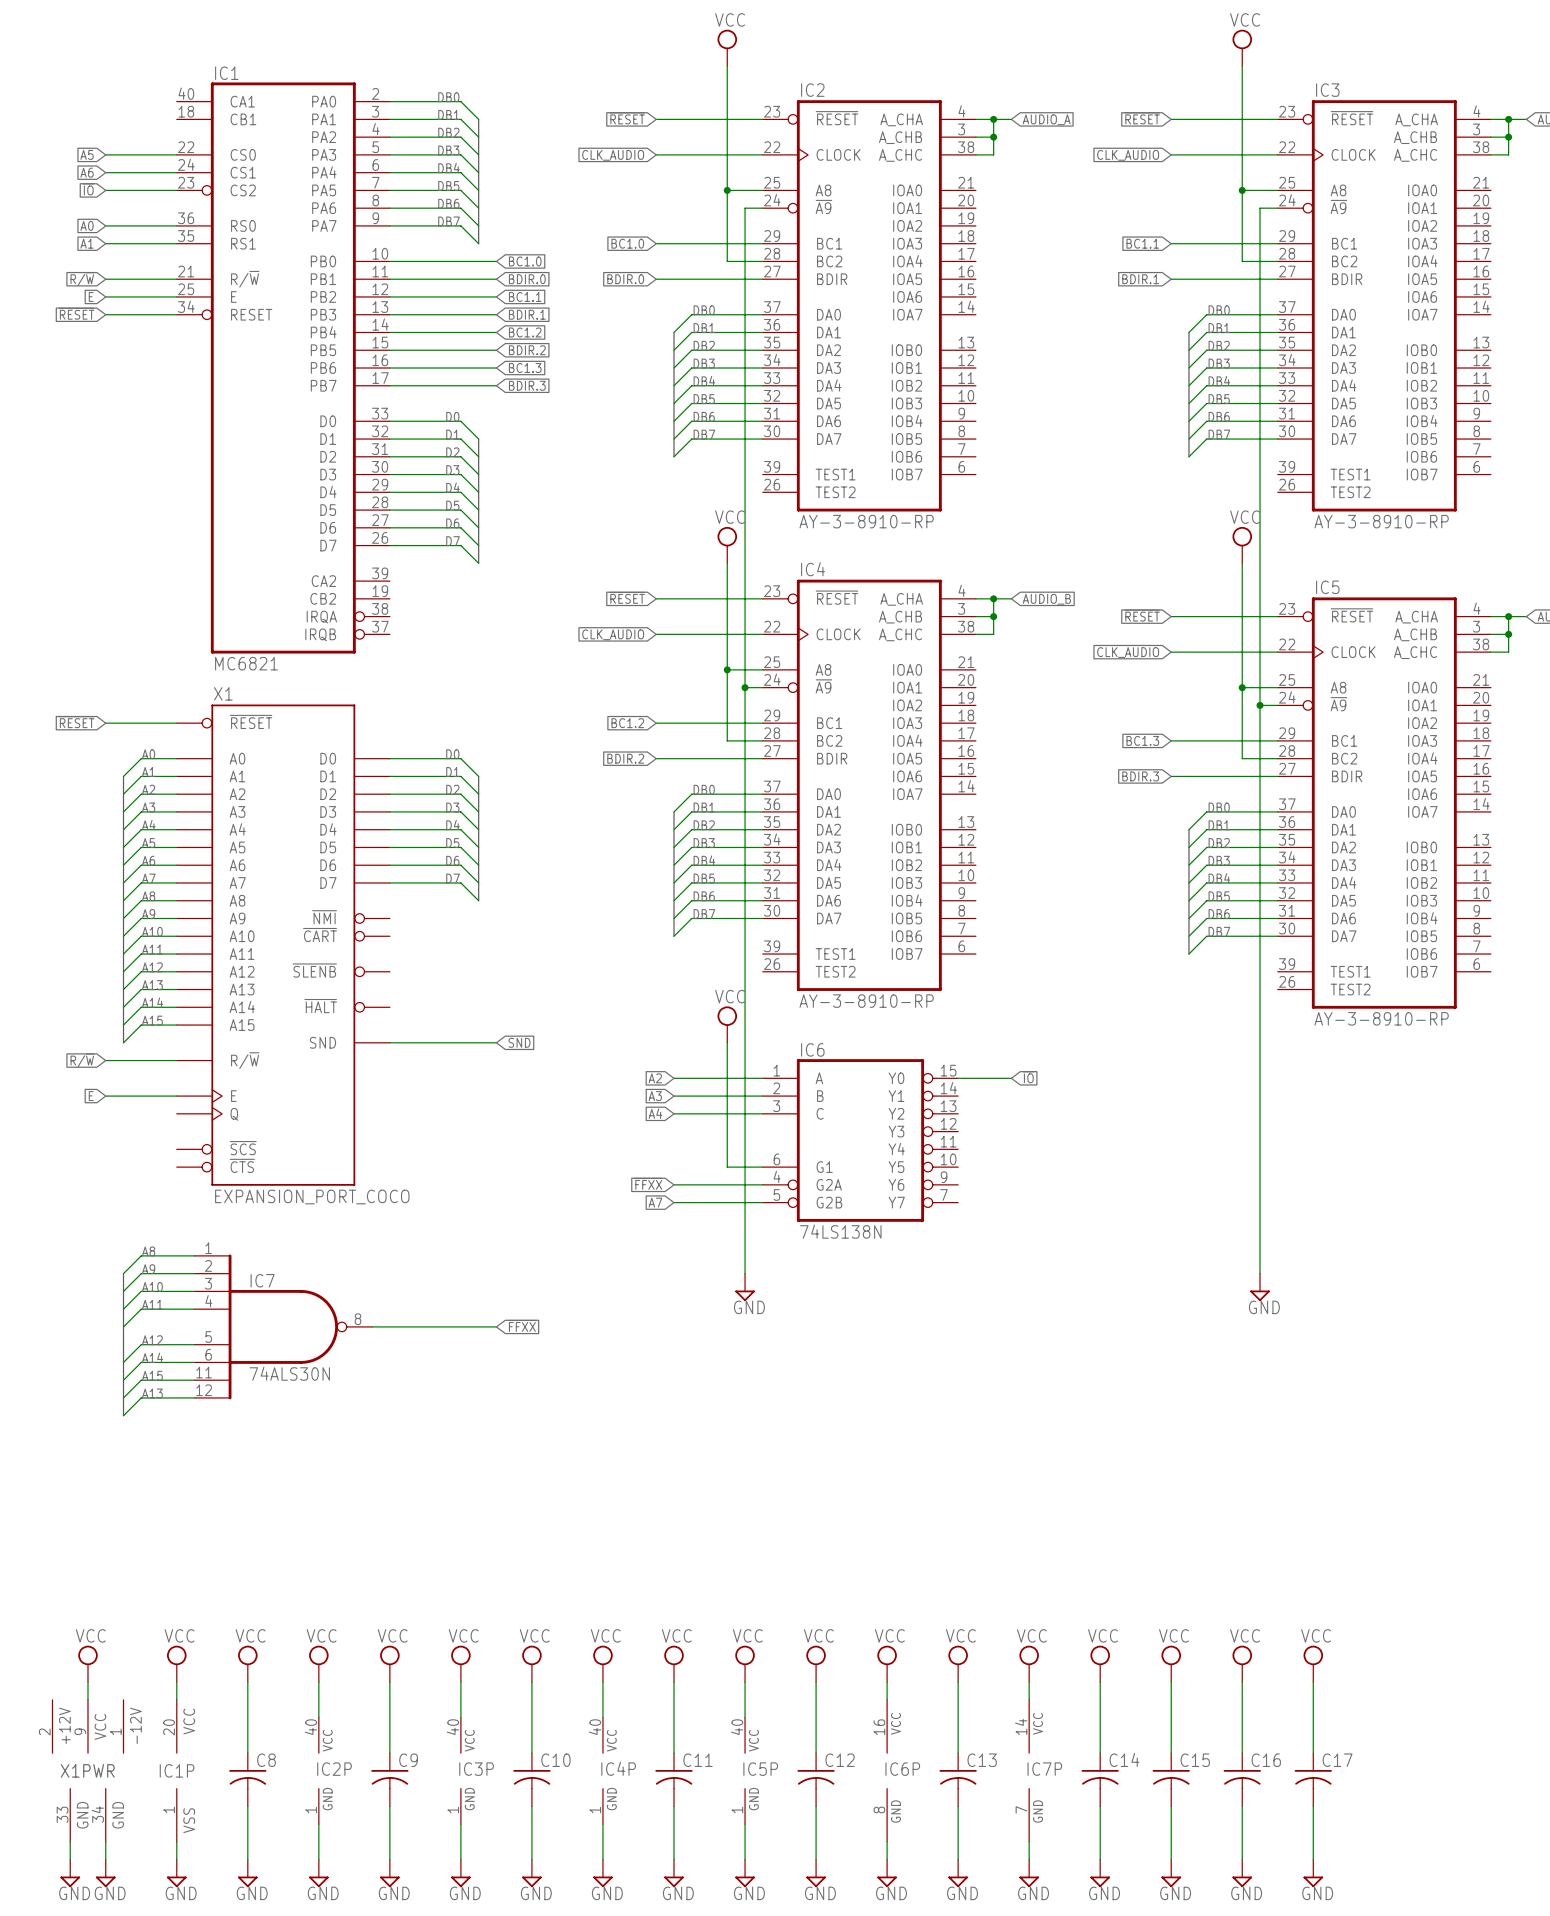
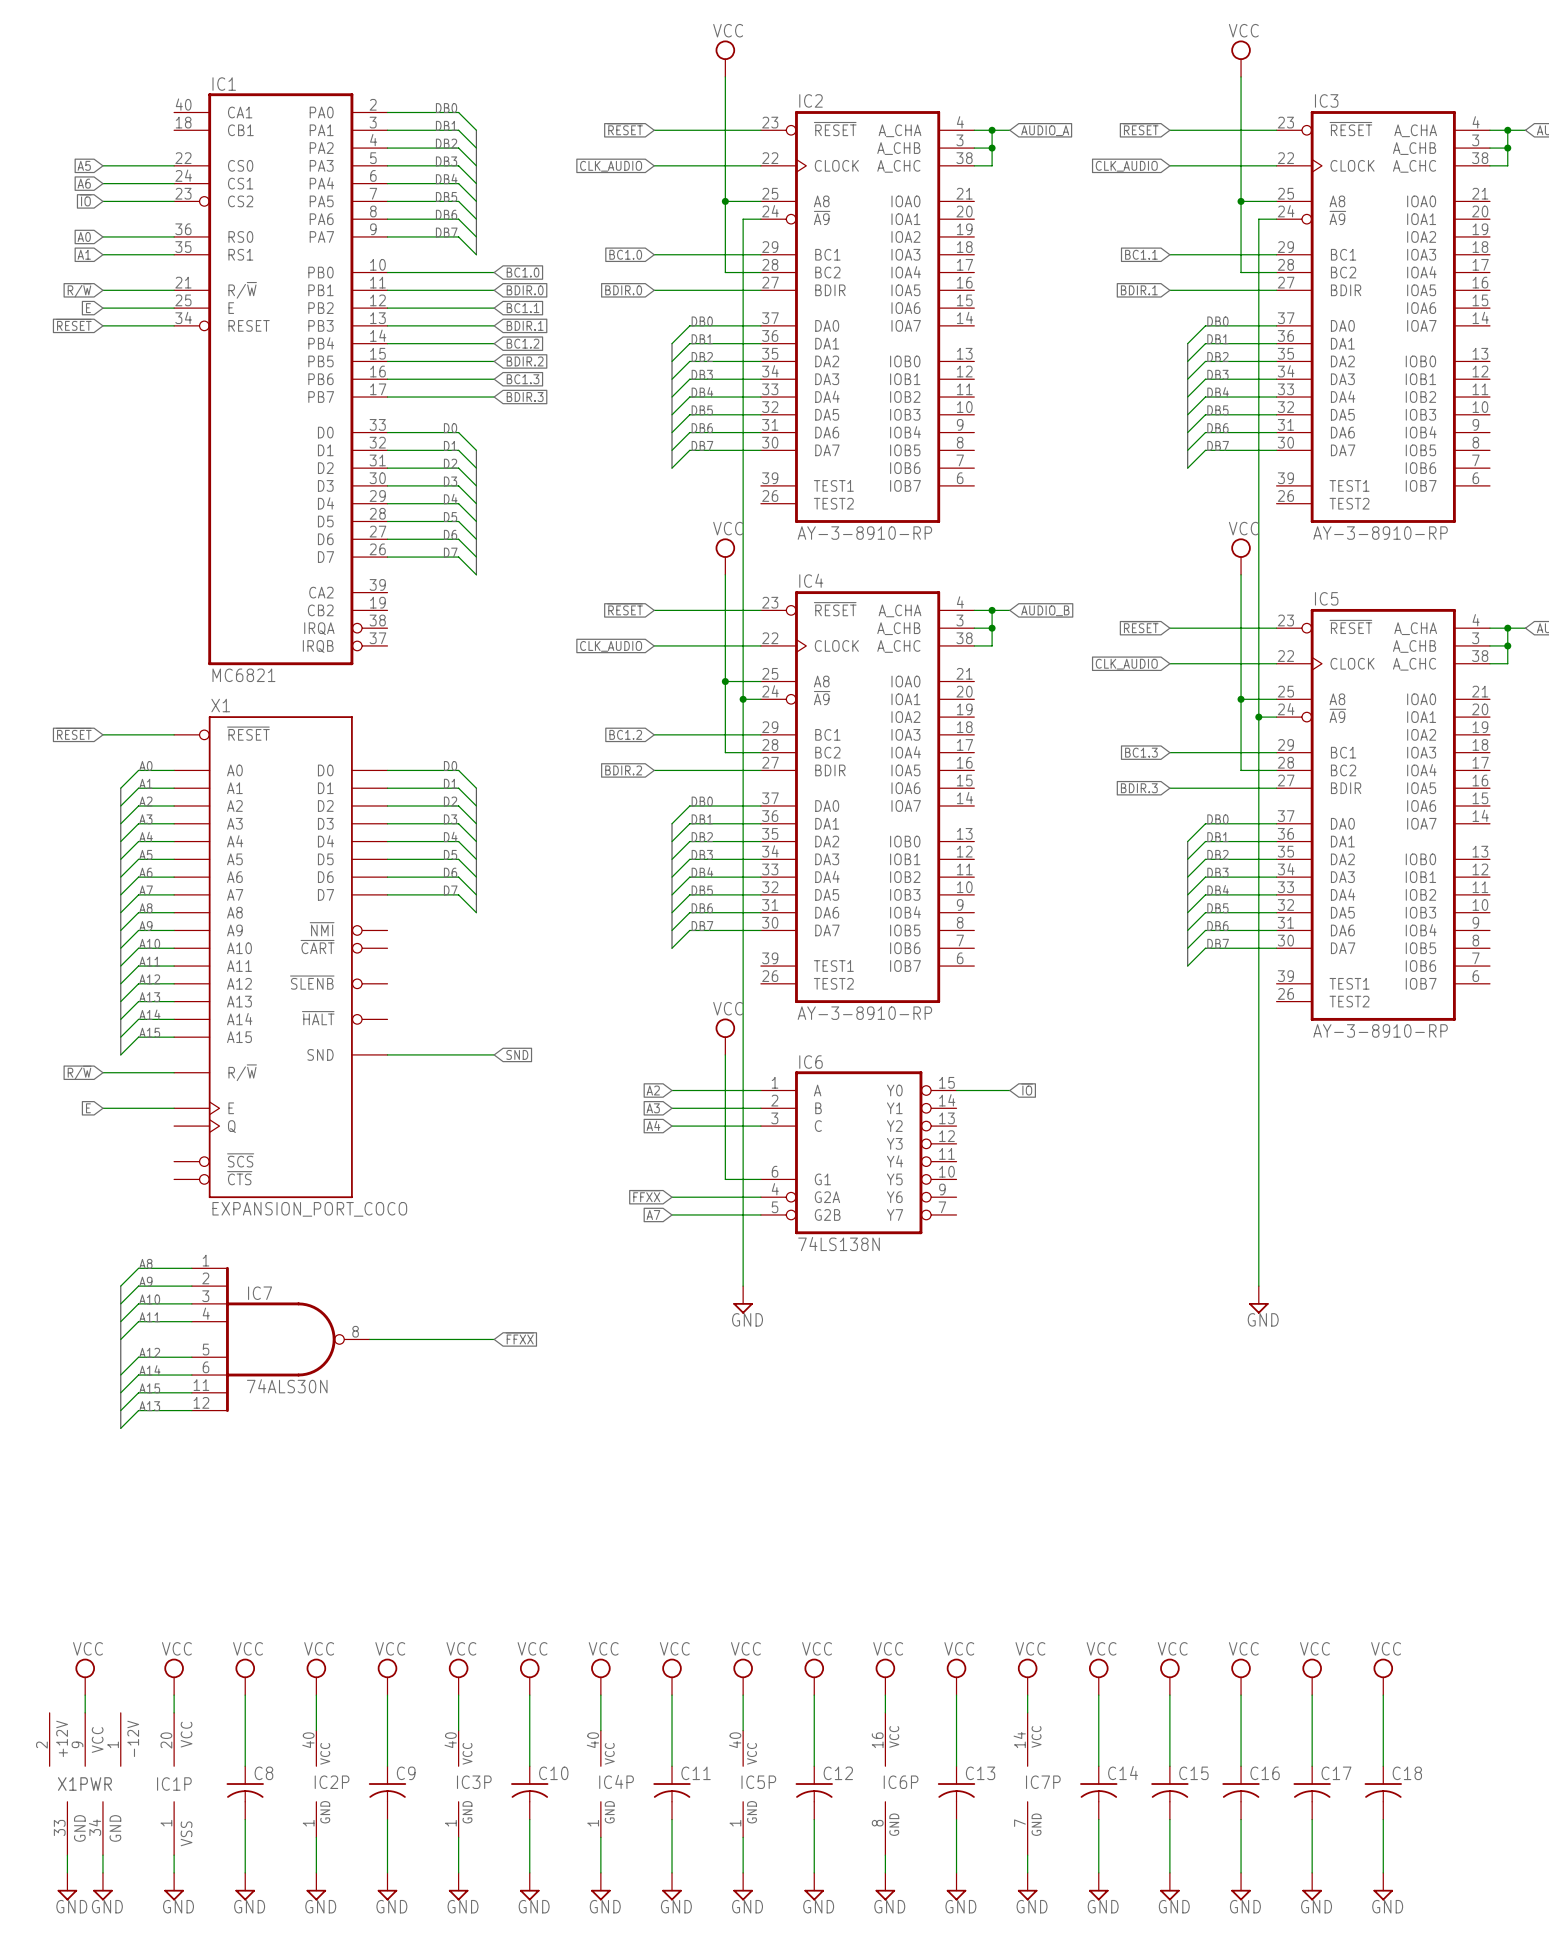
power symbol: none -> VCC (1383, 1676)
wire: none -> (1383, 1695) (1383, 1766)
C18: none -> (1383, 1792)
wire: none -> (1383, 1819) (1383, 1872)
power symbol: none -> GND (1383, 1886)

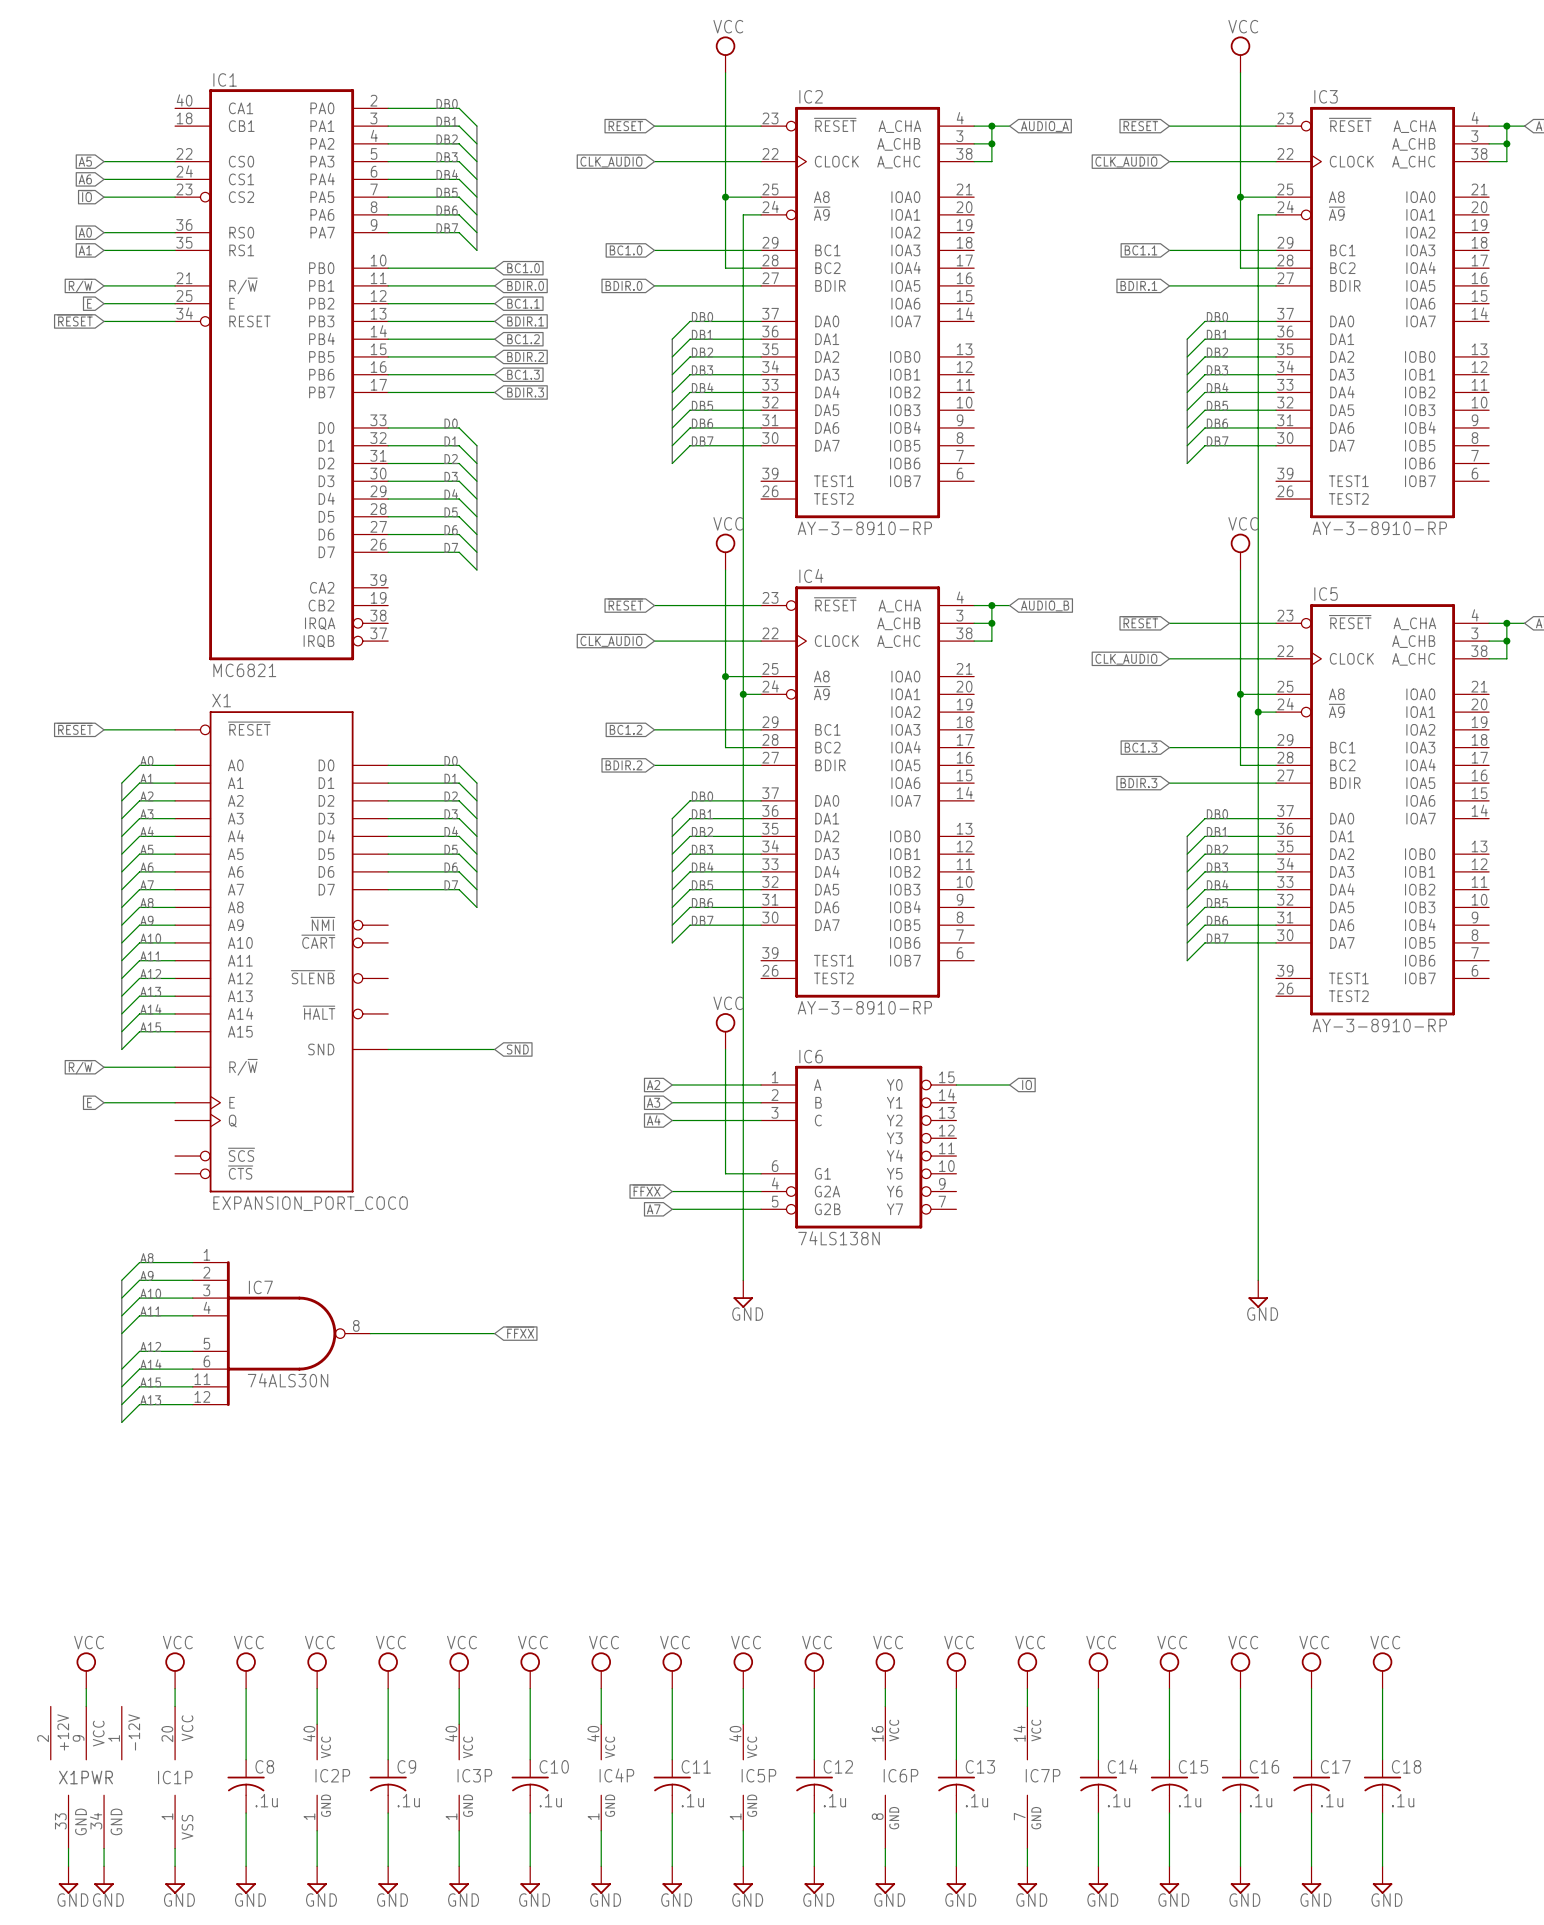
C8 value: none -> .1u (266, 1800)
C9 value: none -> .1u (408, 1800)
C10 value: none -> .1u (550, 1800)
C11 value: none -> .1u (692, 1800)
C12 value: none -> .1u (834, 1800)
C13 value: none -> .1u (976, 1800)
C14 value: none -> .1u (1118, 1800)
C15 value: none -> .1u (1190, 1800)
C16 value: none -> .1u (1261, 1800)
C17 value: none -> .1u (1332, 1800)
C18 value: none -> .1u (1403, 1800)

